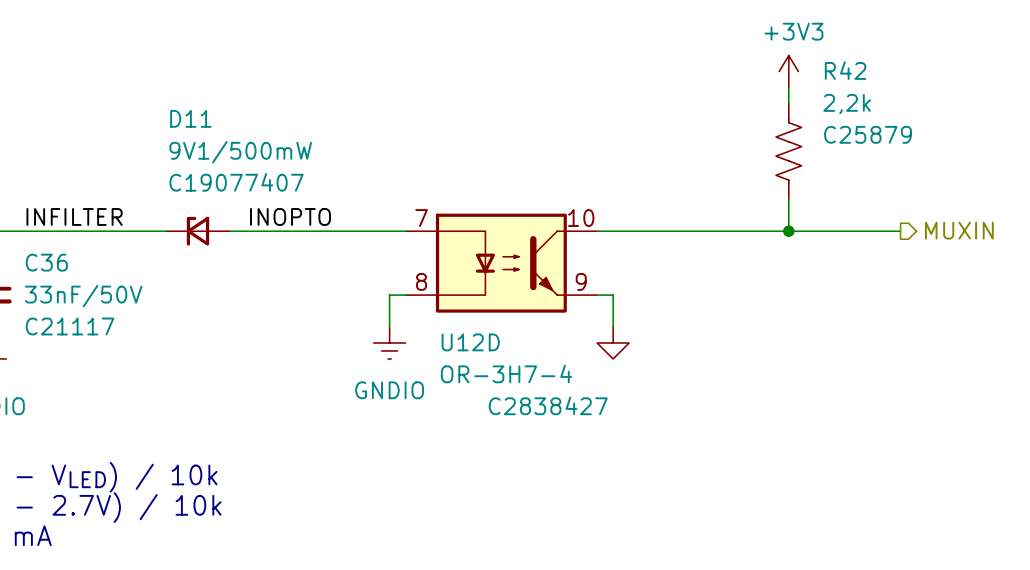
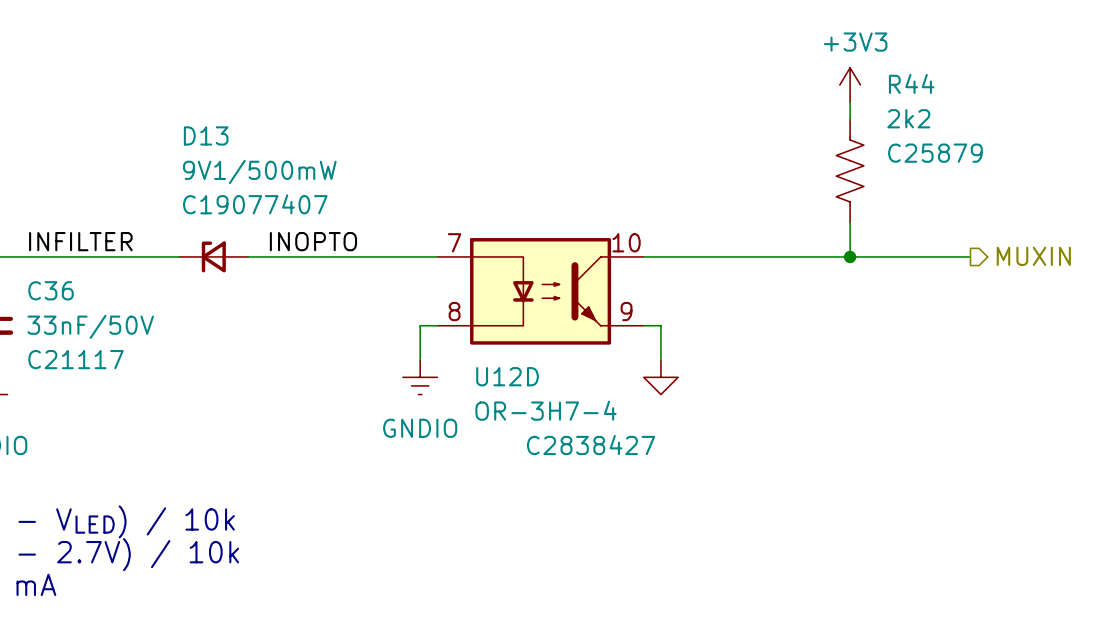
R42 name: R42 (845, 70) -> R44 (911, 83)
R42 value: 2,2k (847, 104) -> 2k2 (908, 118)
D11 name: D11 (190, 118) -> D13 (206, 135)

